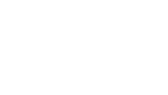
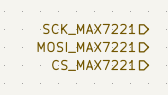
hierarchical label: none -> SCK_MAX7221 (89, 29)
hierarchical label: none -> MOSI_MAX7221 (86, 47)
hierarchical label: none -> CS_MAX7221 (93, 65)

